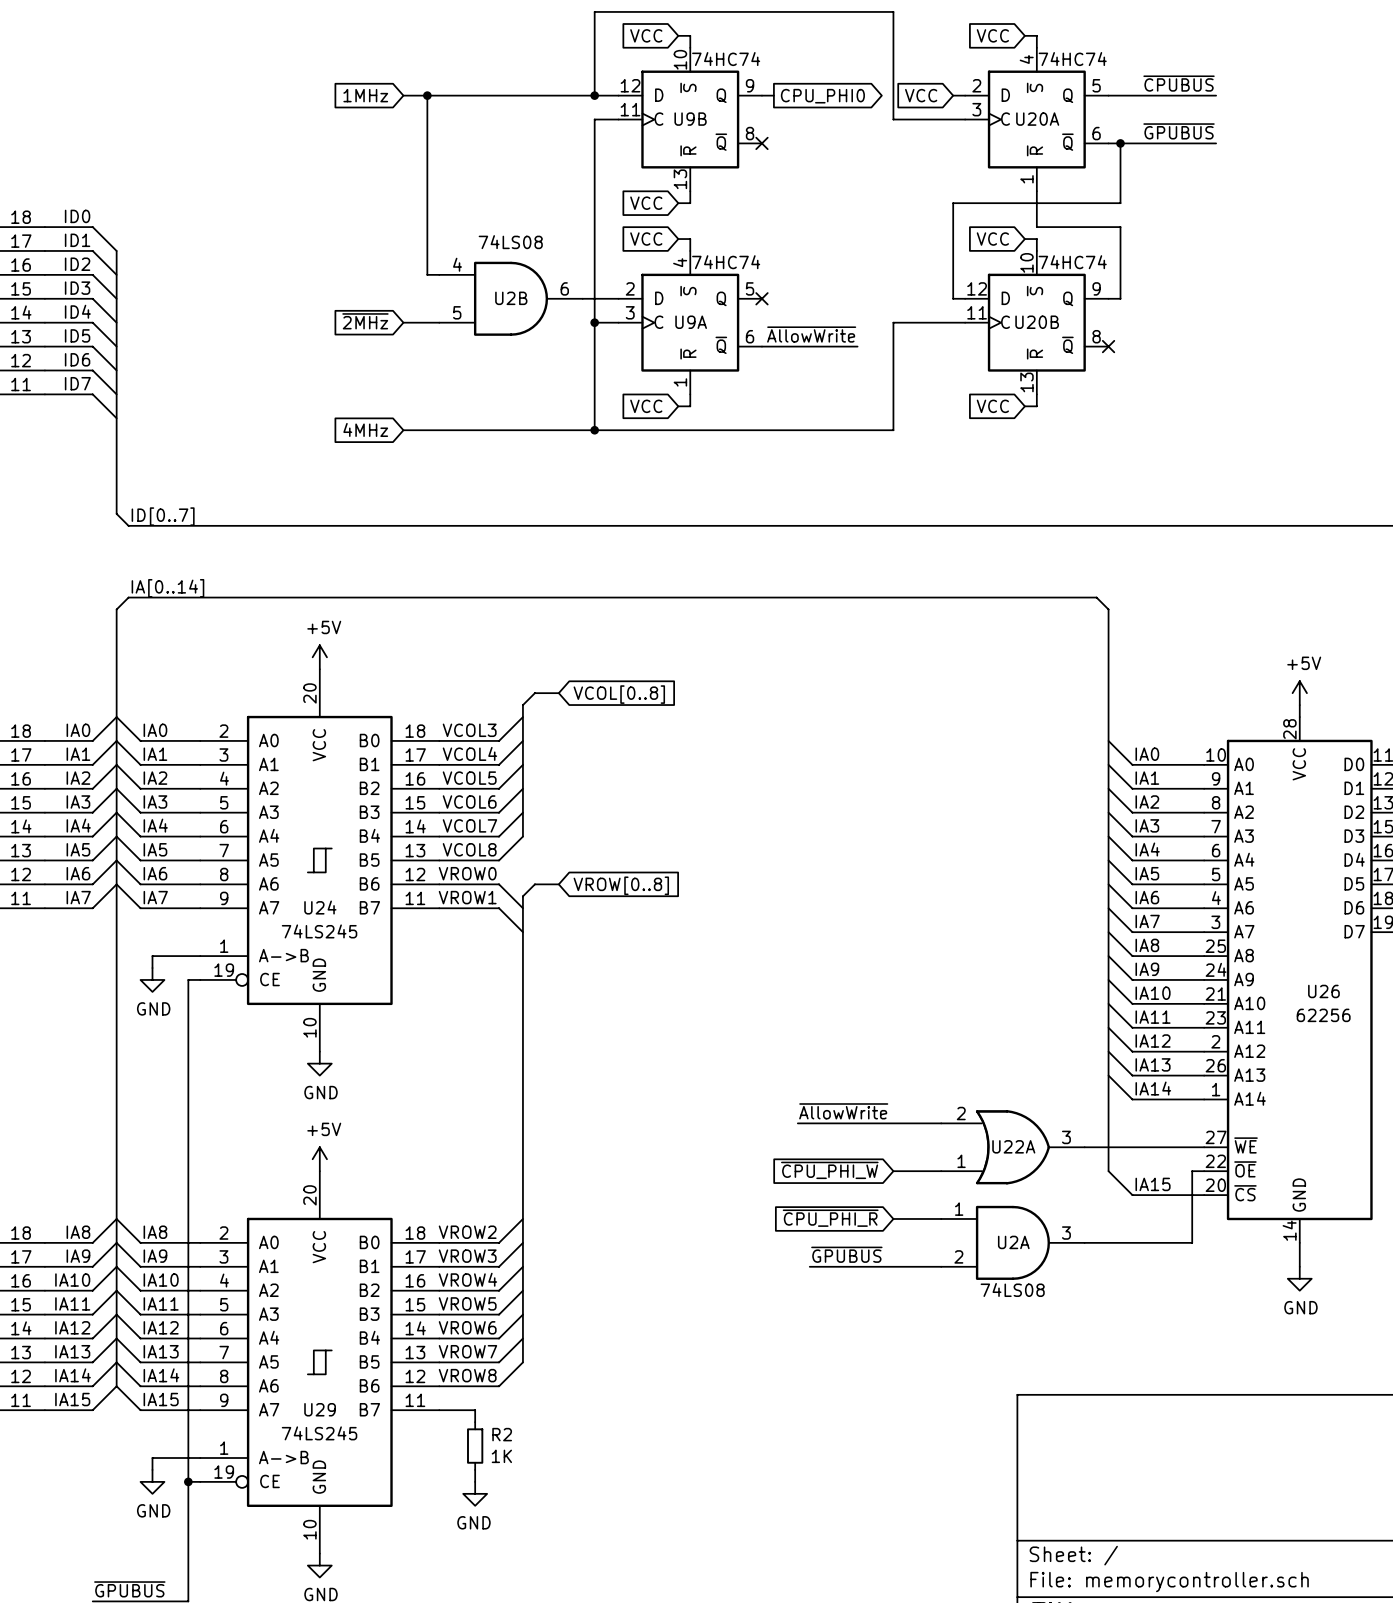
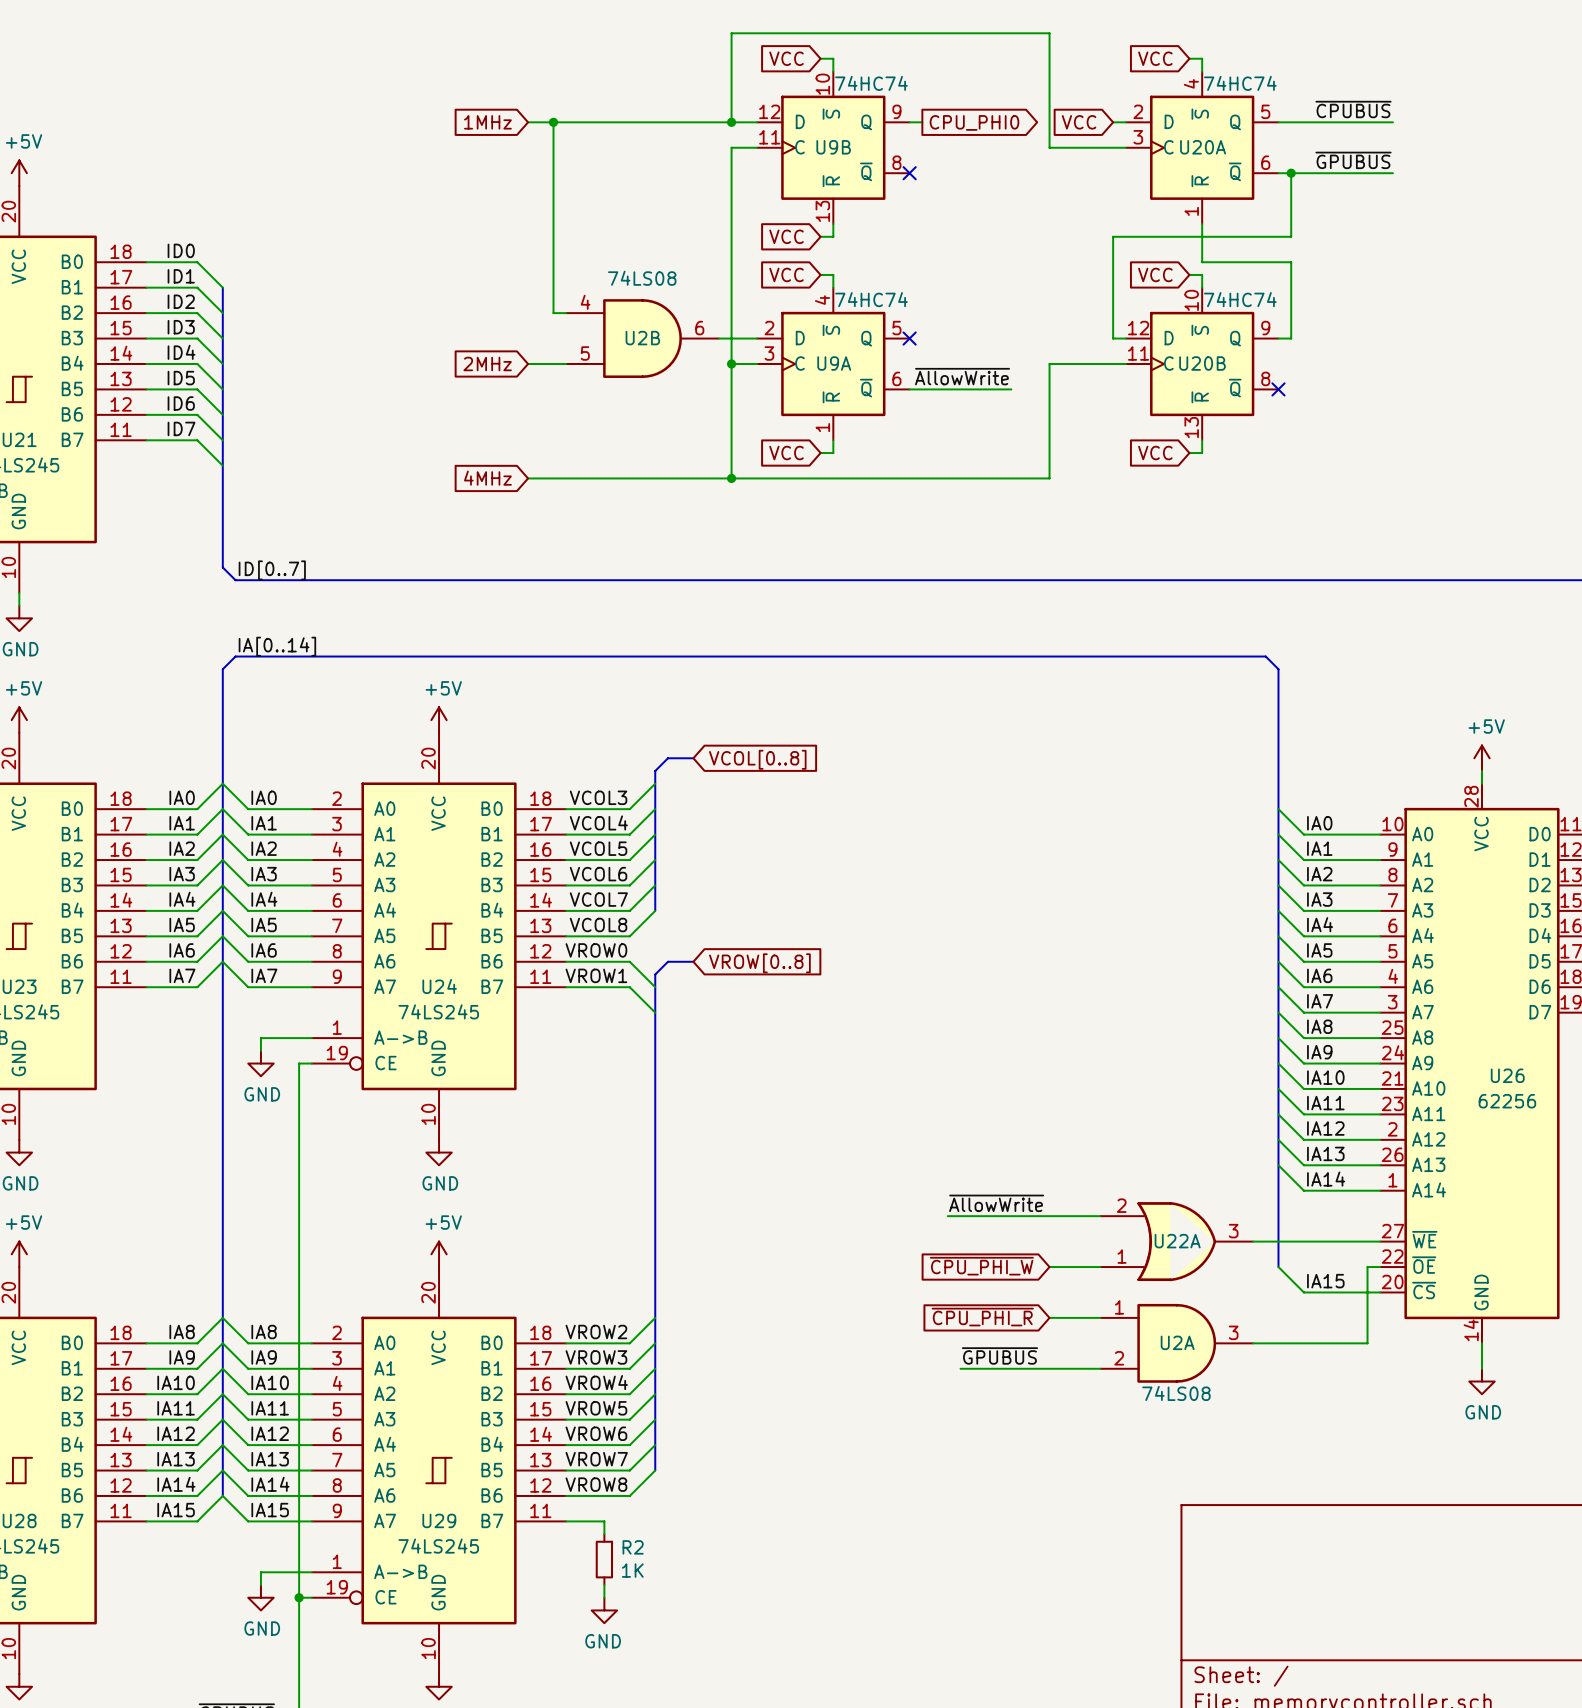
global label: ~{2MHz} (365, 321) -> 2MHz (487, 363)

